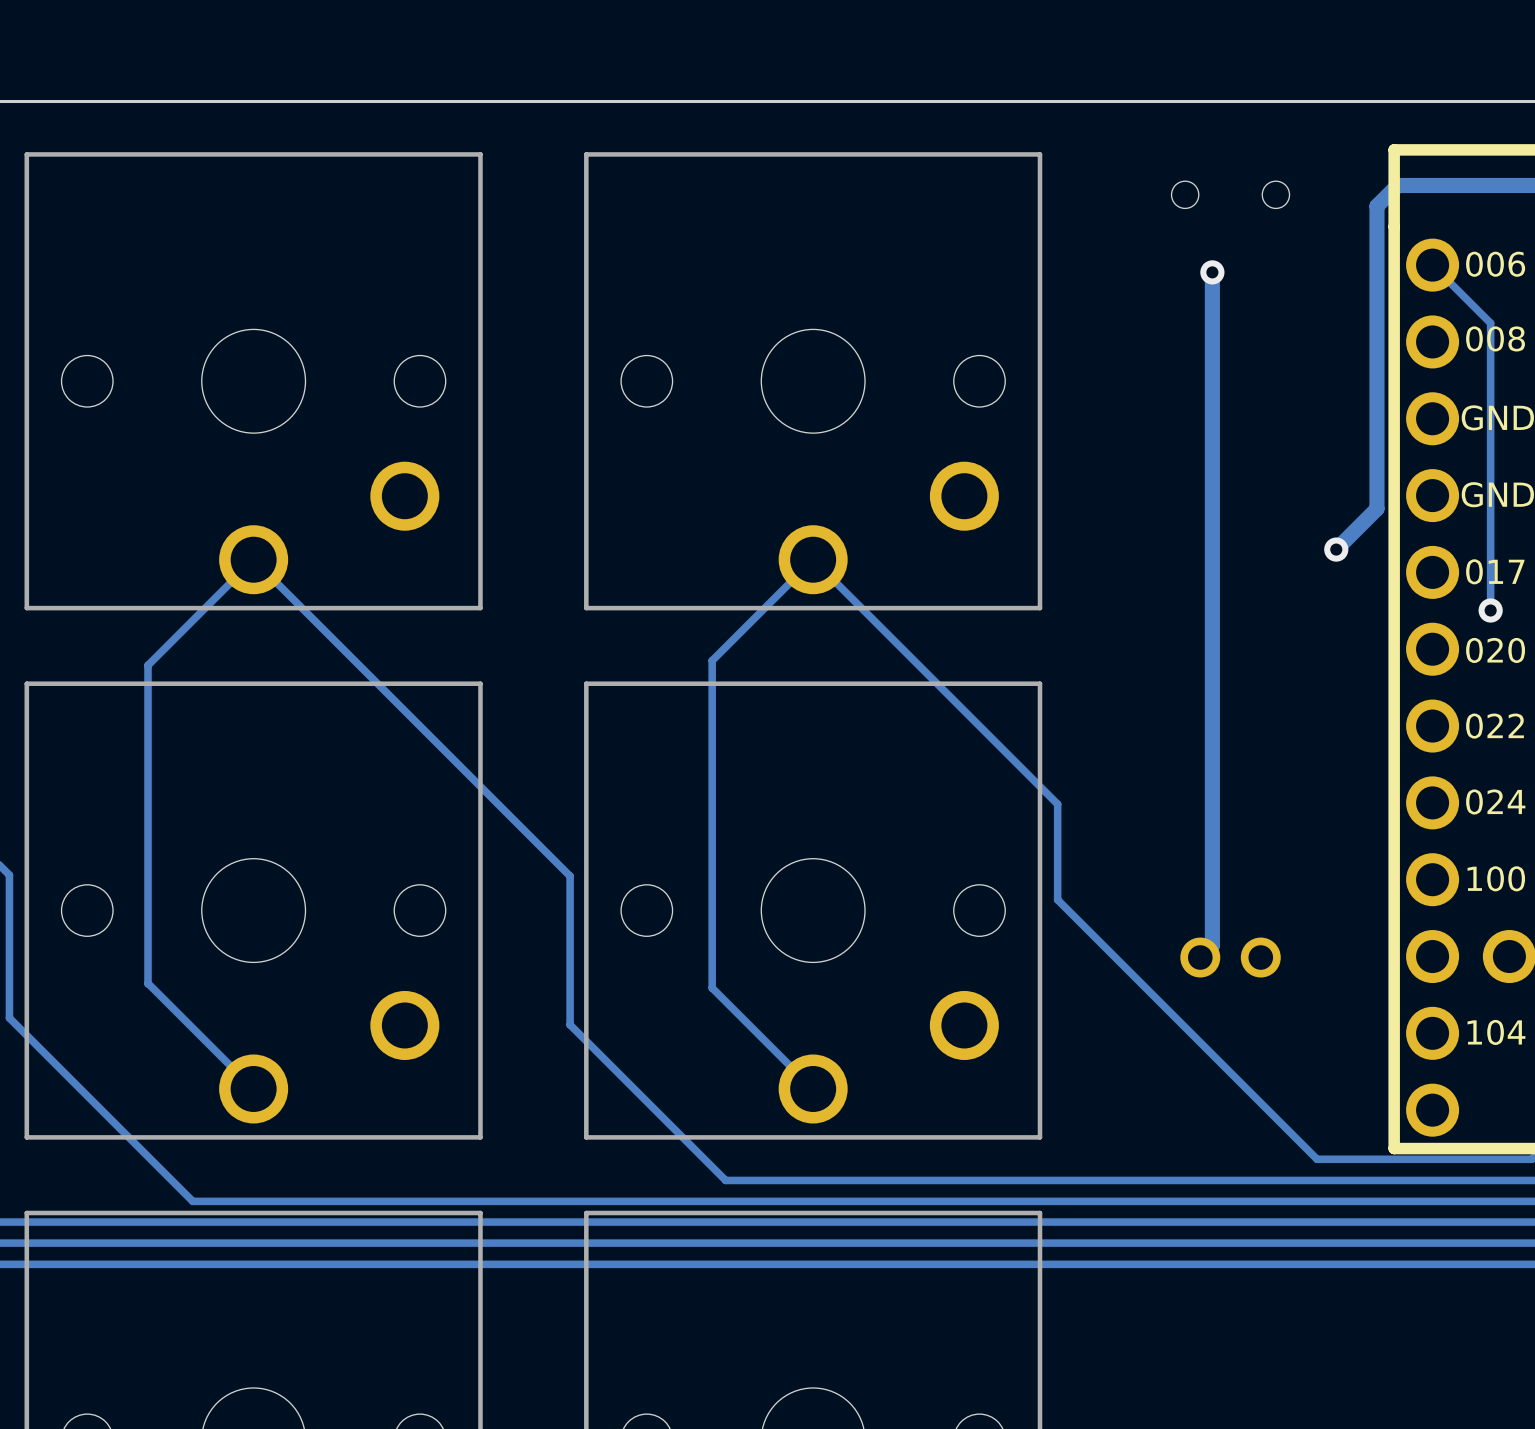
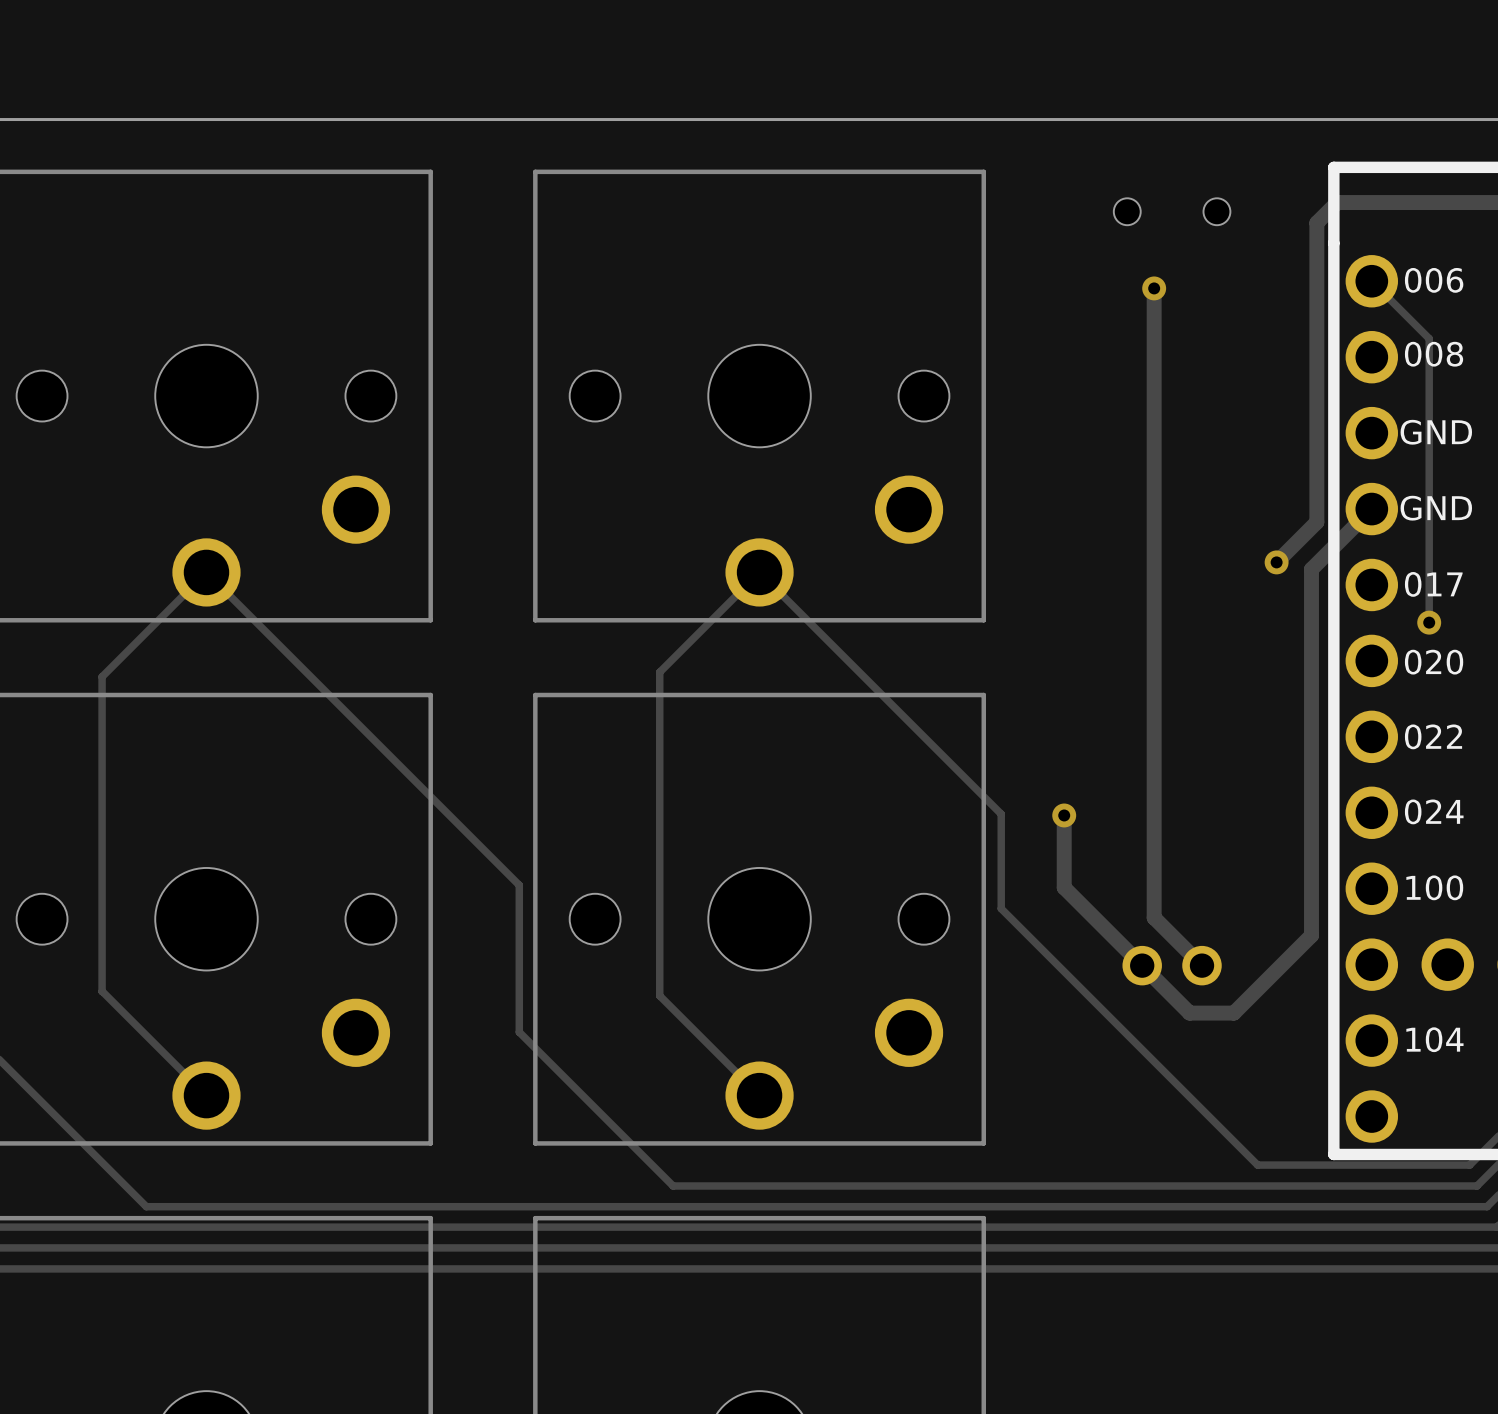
track: none -> (1371, 509) (1311, 569) (1311, 935) (1233, 1013) (1189, 1013) (1064, 887) (1064, 815)
via: none -> (1064, 815)
track: (1212, 909) (1212, 945) (1200, 957) -> (1154, 917) (1202, 965)

